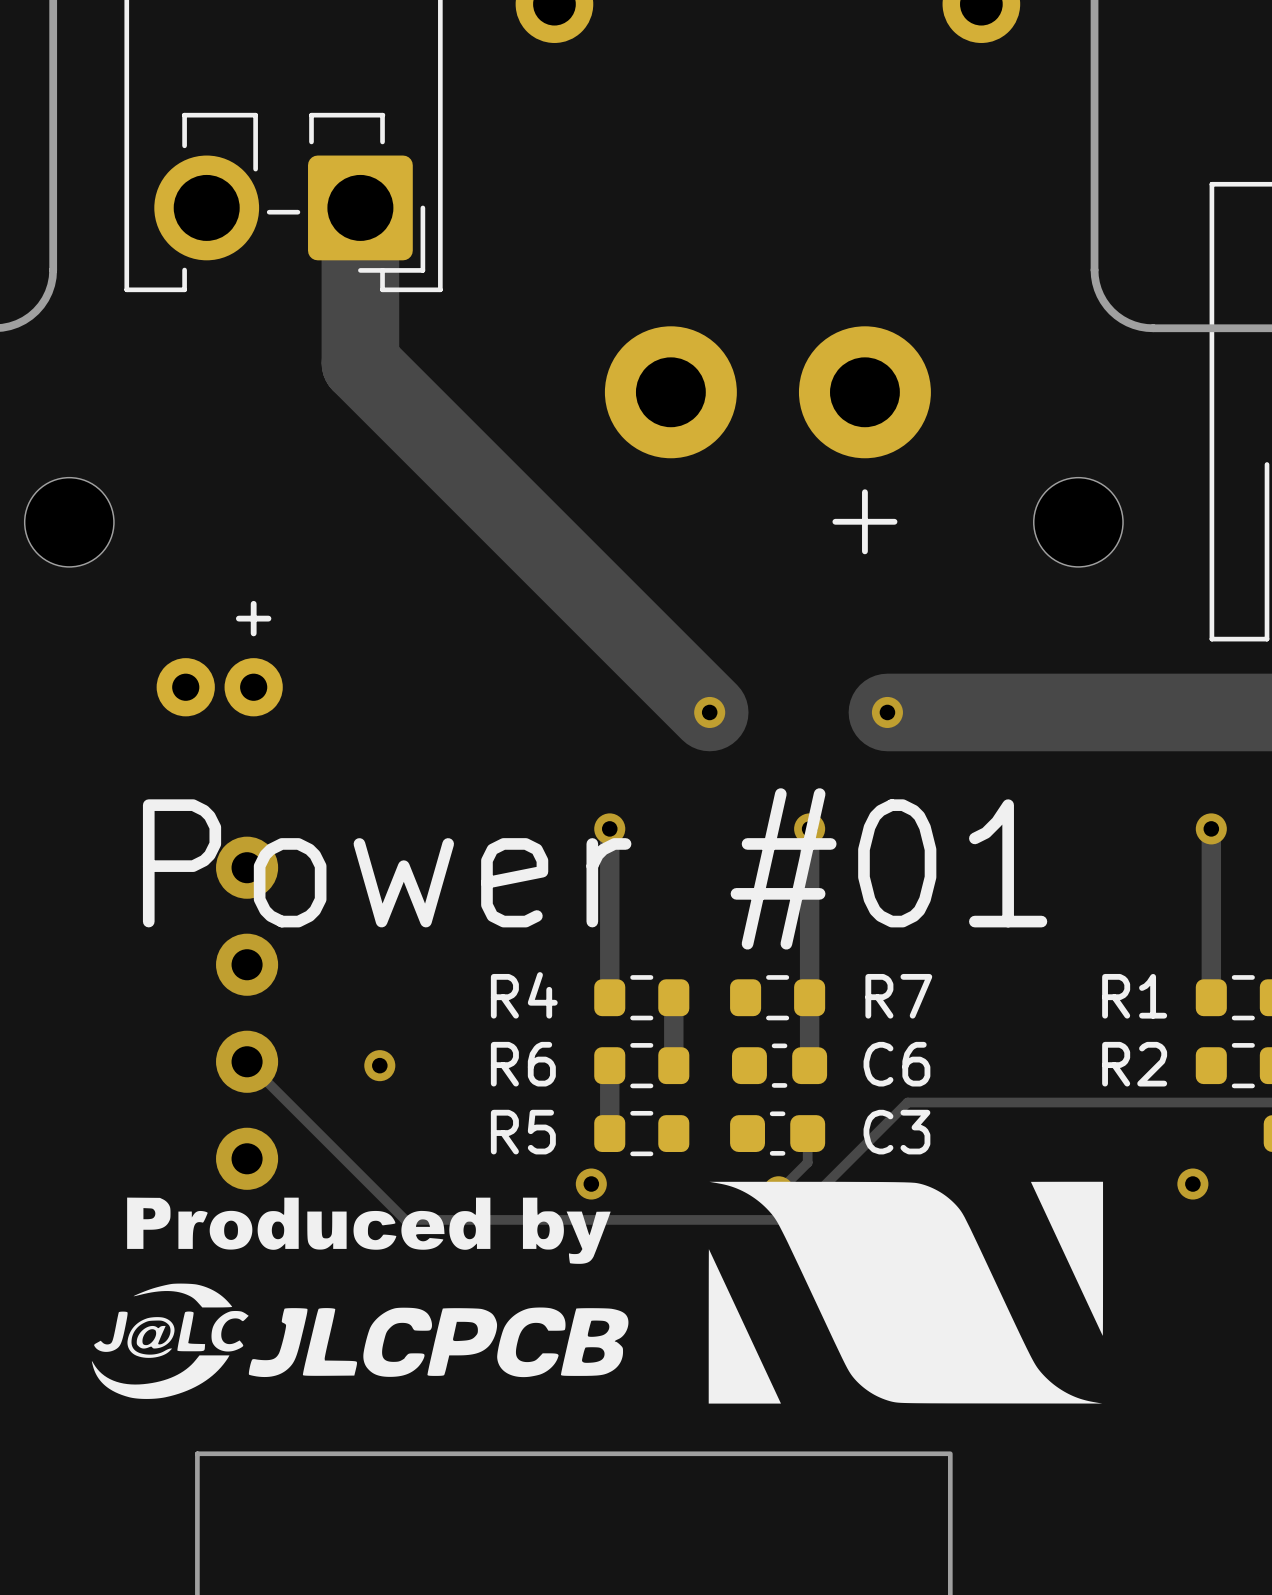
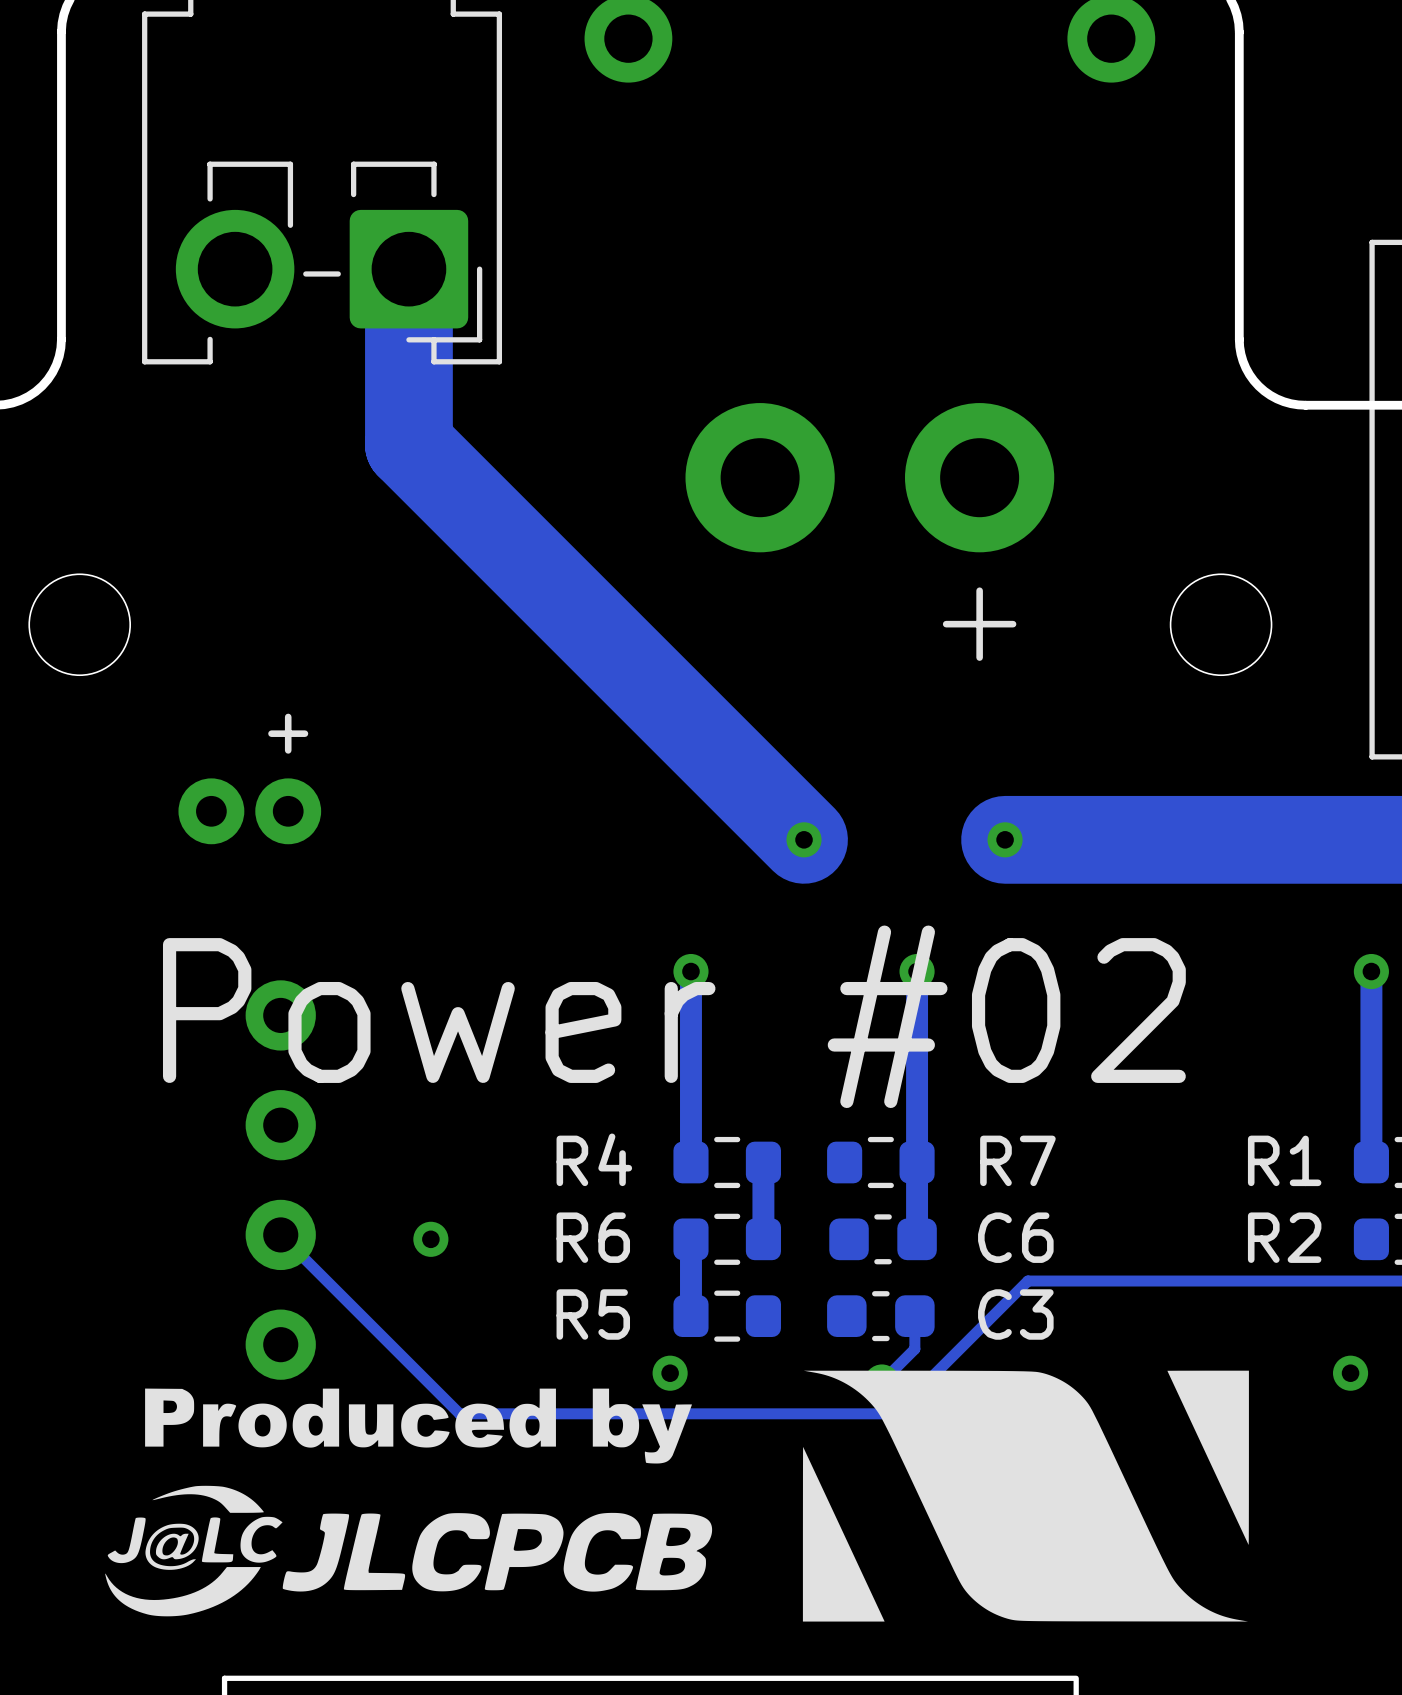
text: Power #01 (595, 868) -> Power #02 (674, 1016)

